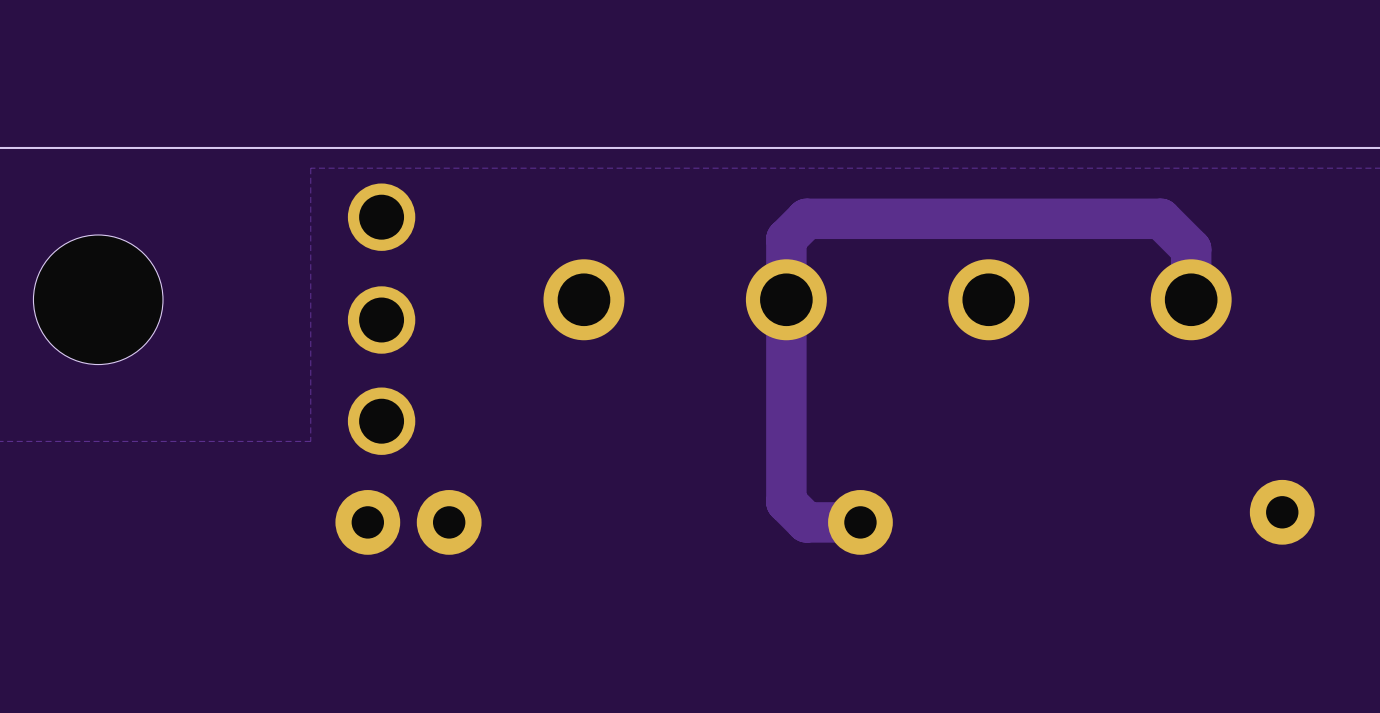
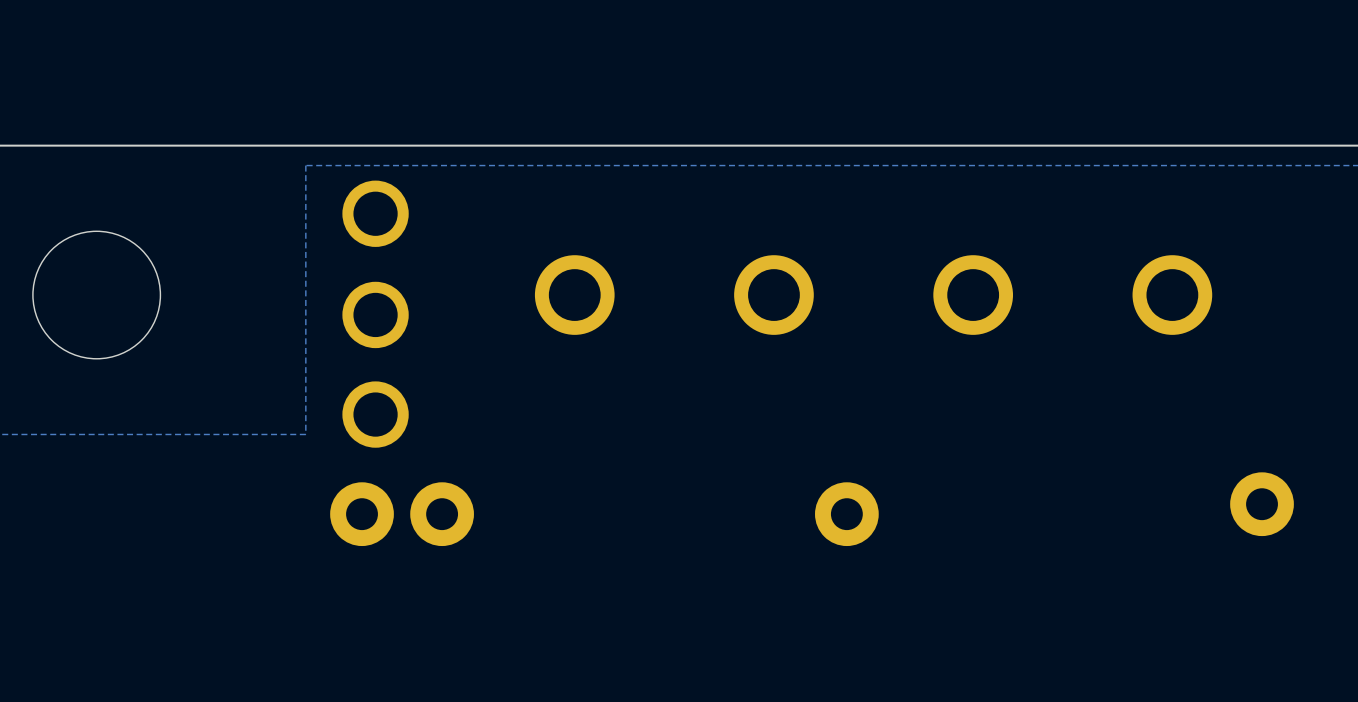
track: (1191, 299) (1191, 249) (1160, 218) (806, 218) (786, 239) (786, 502) (806, 522) (860, 522) -> none

